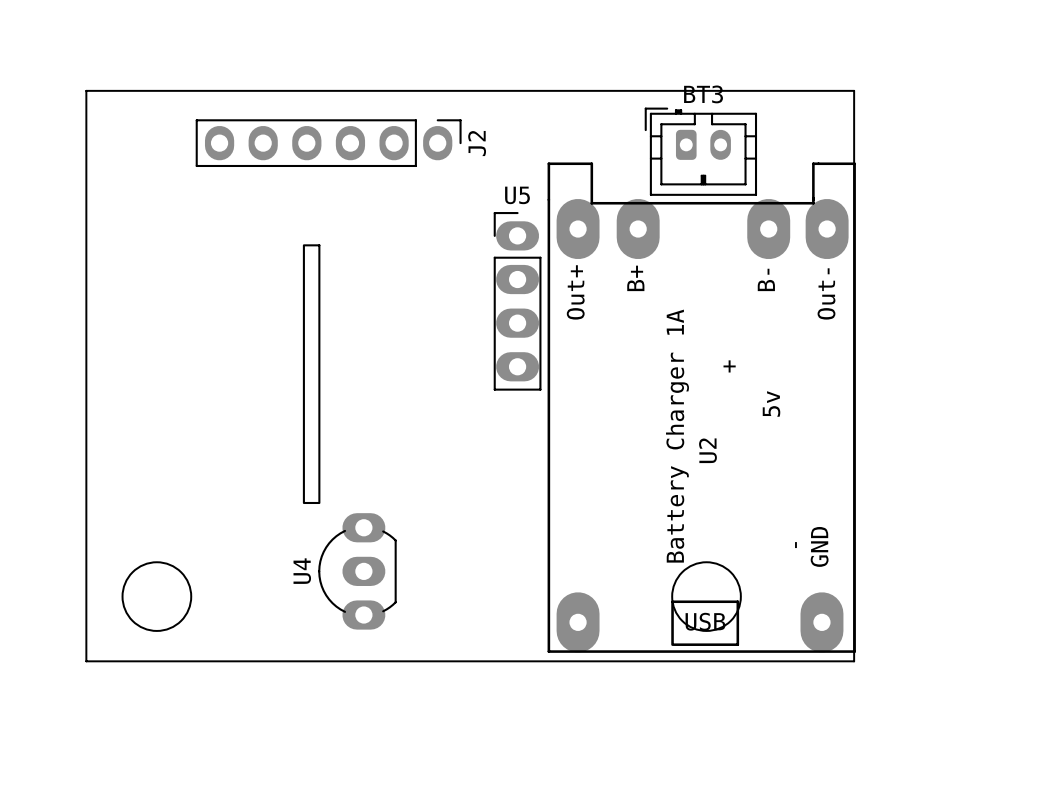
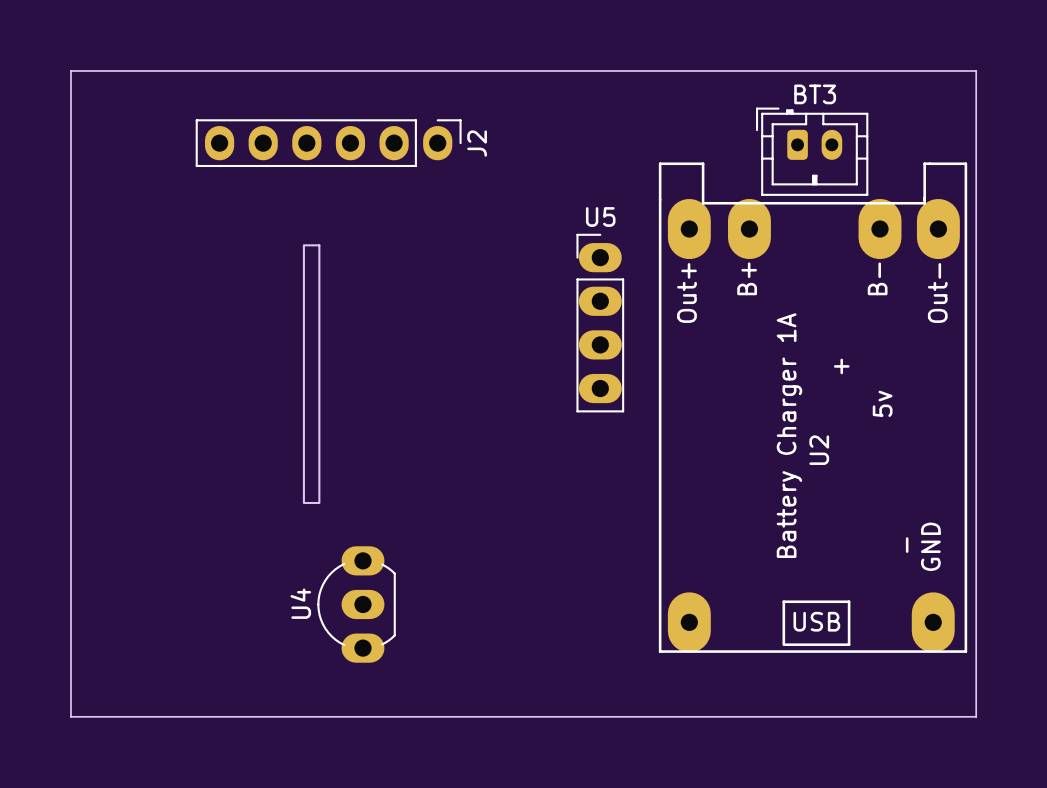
board edge: (86, 90) (854, 90) (854, 661) (86, 661) (86, 90) -> (71, 71) (71, 716) (976, 716) (976, 71) (71, 71)
BT3 position: (700, 151) -> (812, 151)
U5 position: (517, 301) -> (600, 323)
U2 position: (701, 407) -> (813, 407)
round board edge: [121, 561, 193, 632] -> none
round board edge: [671, 561, 742, 632] -> none
U4 position: (357, 571) -> (356, 604)

